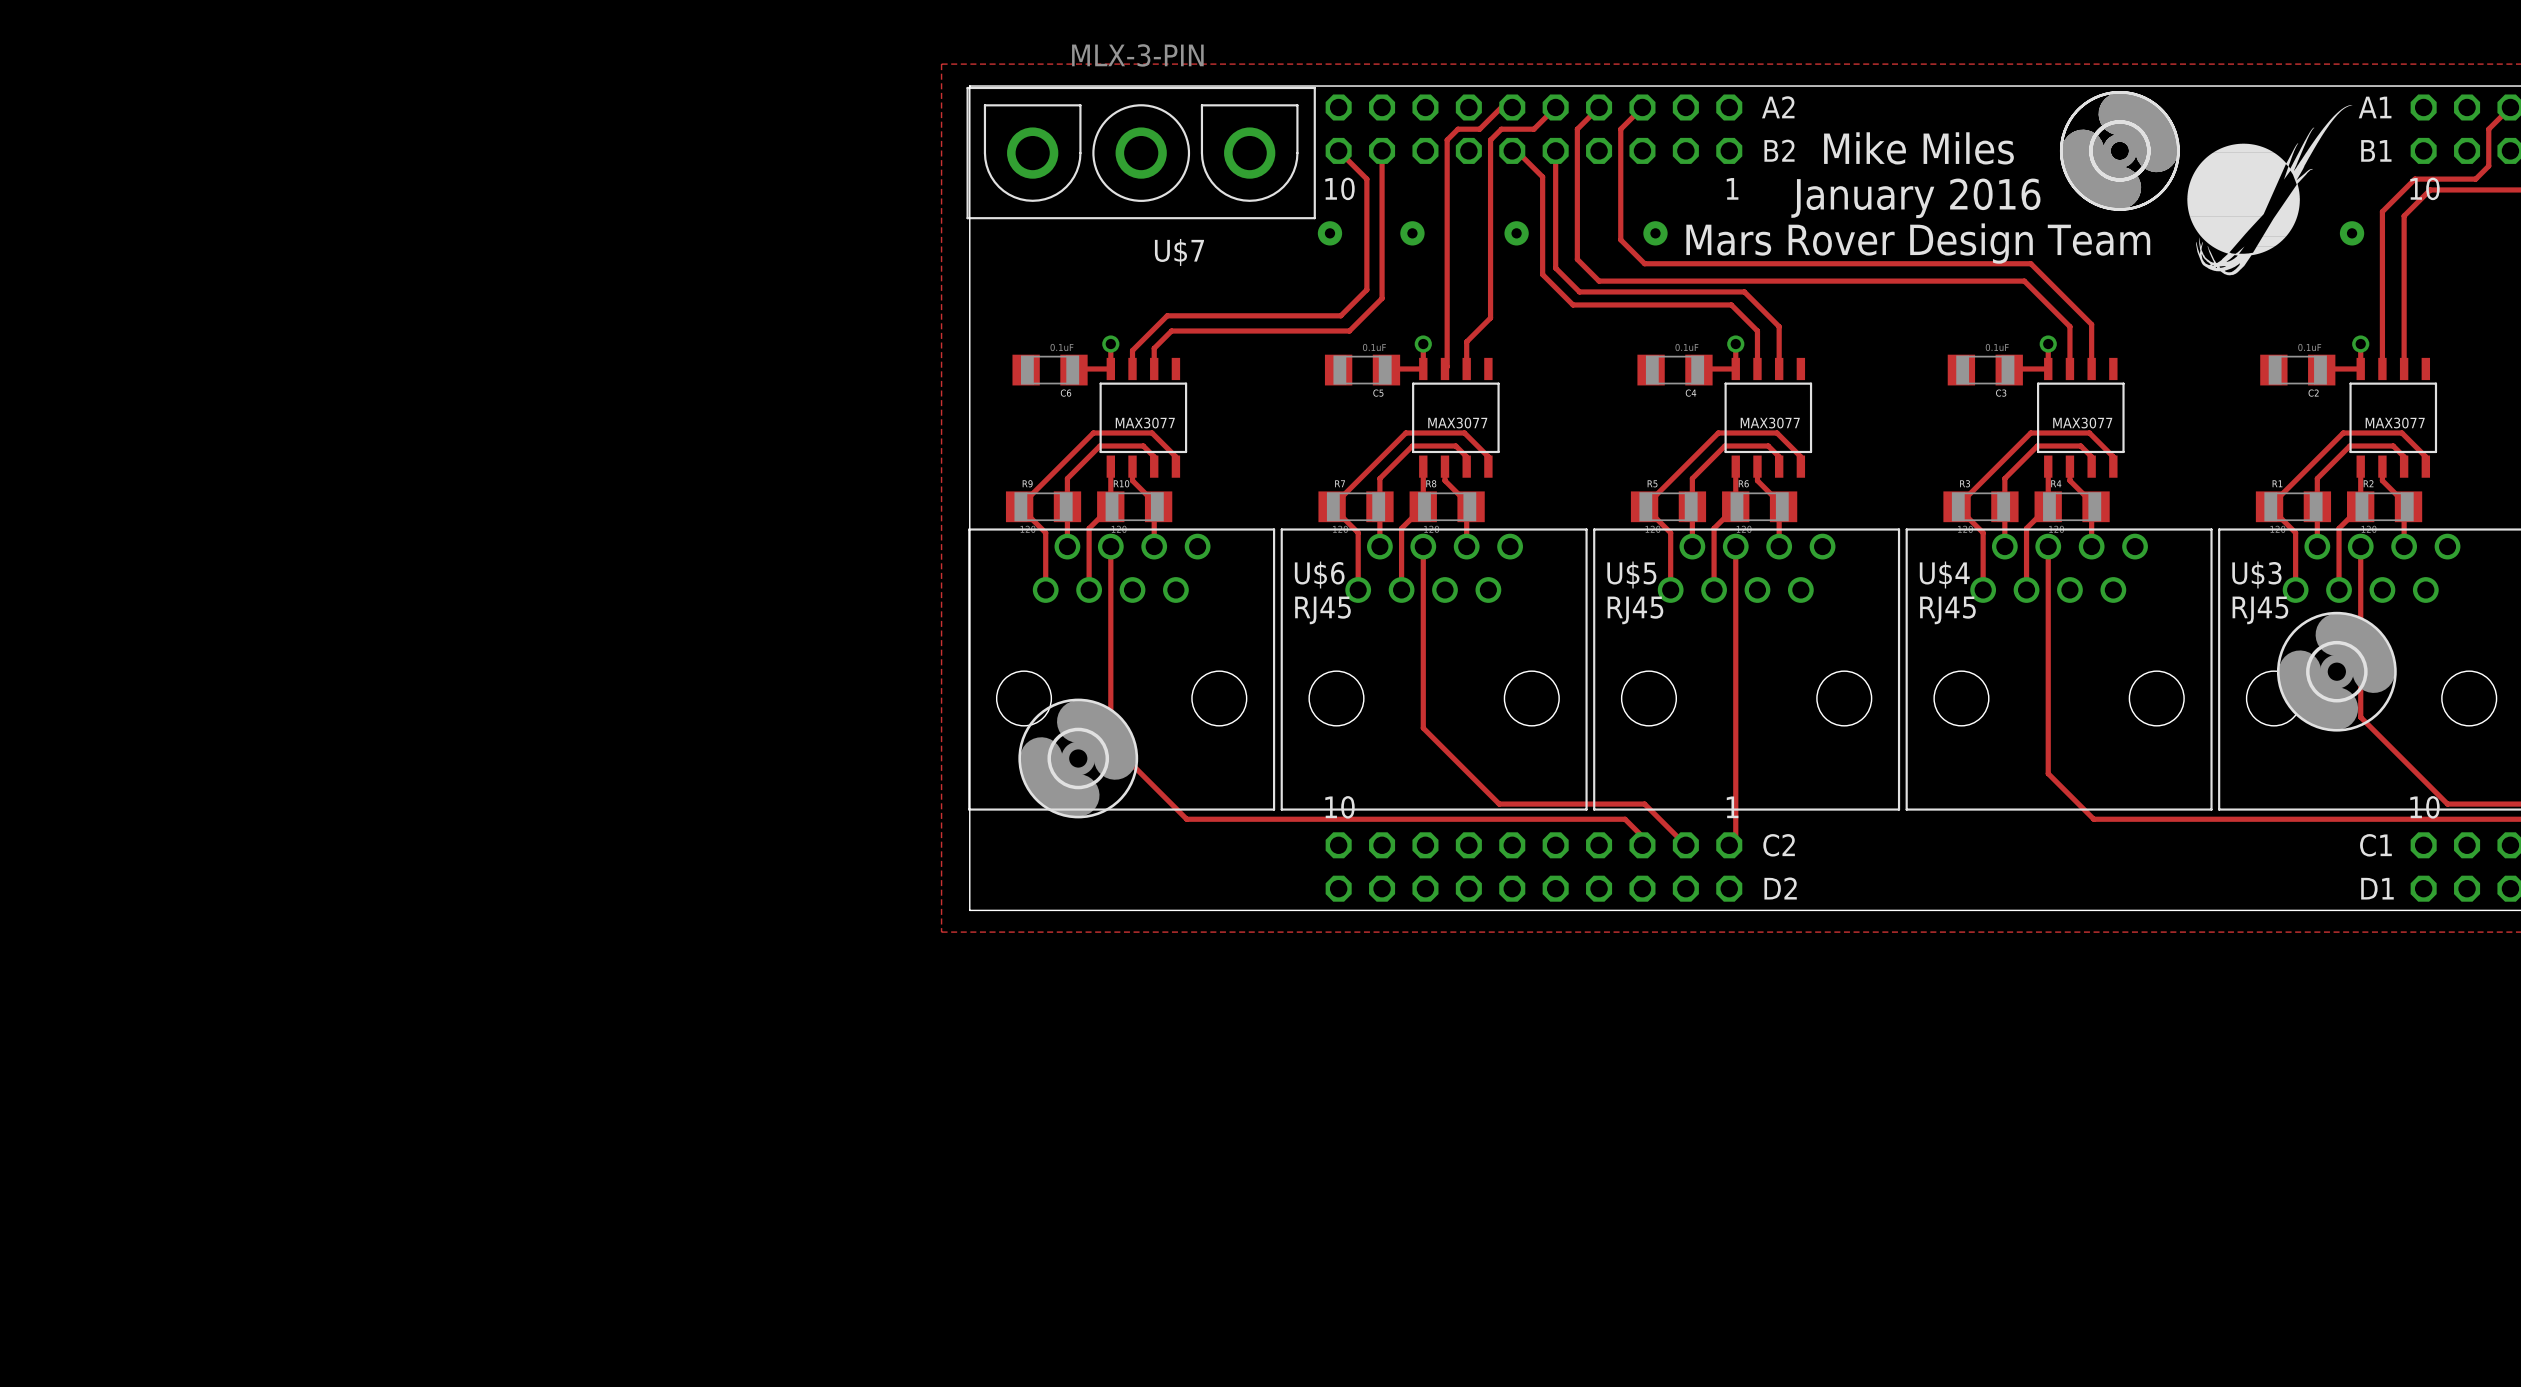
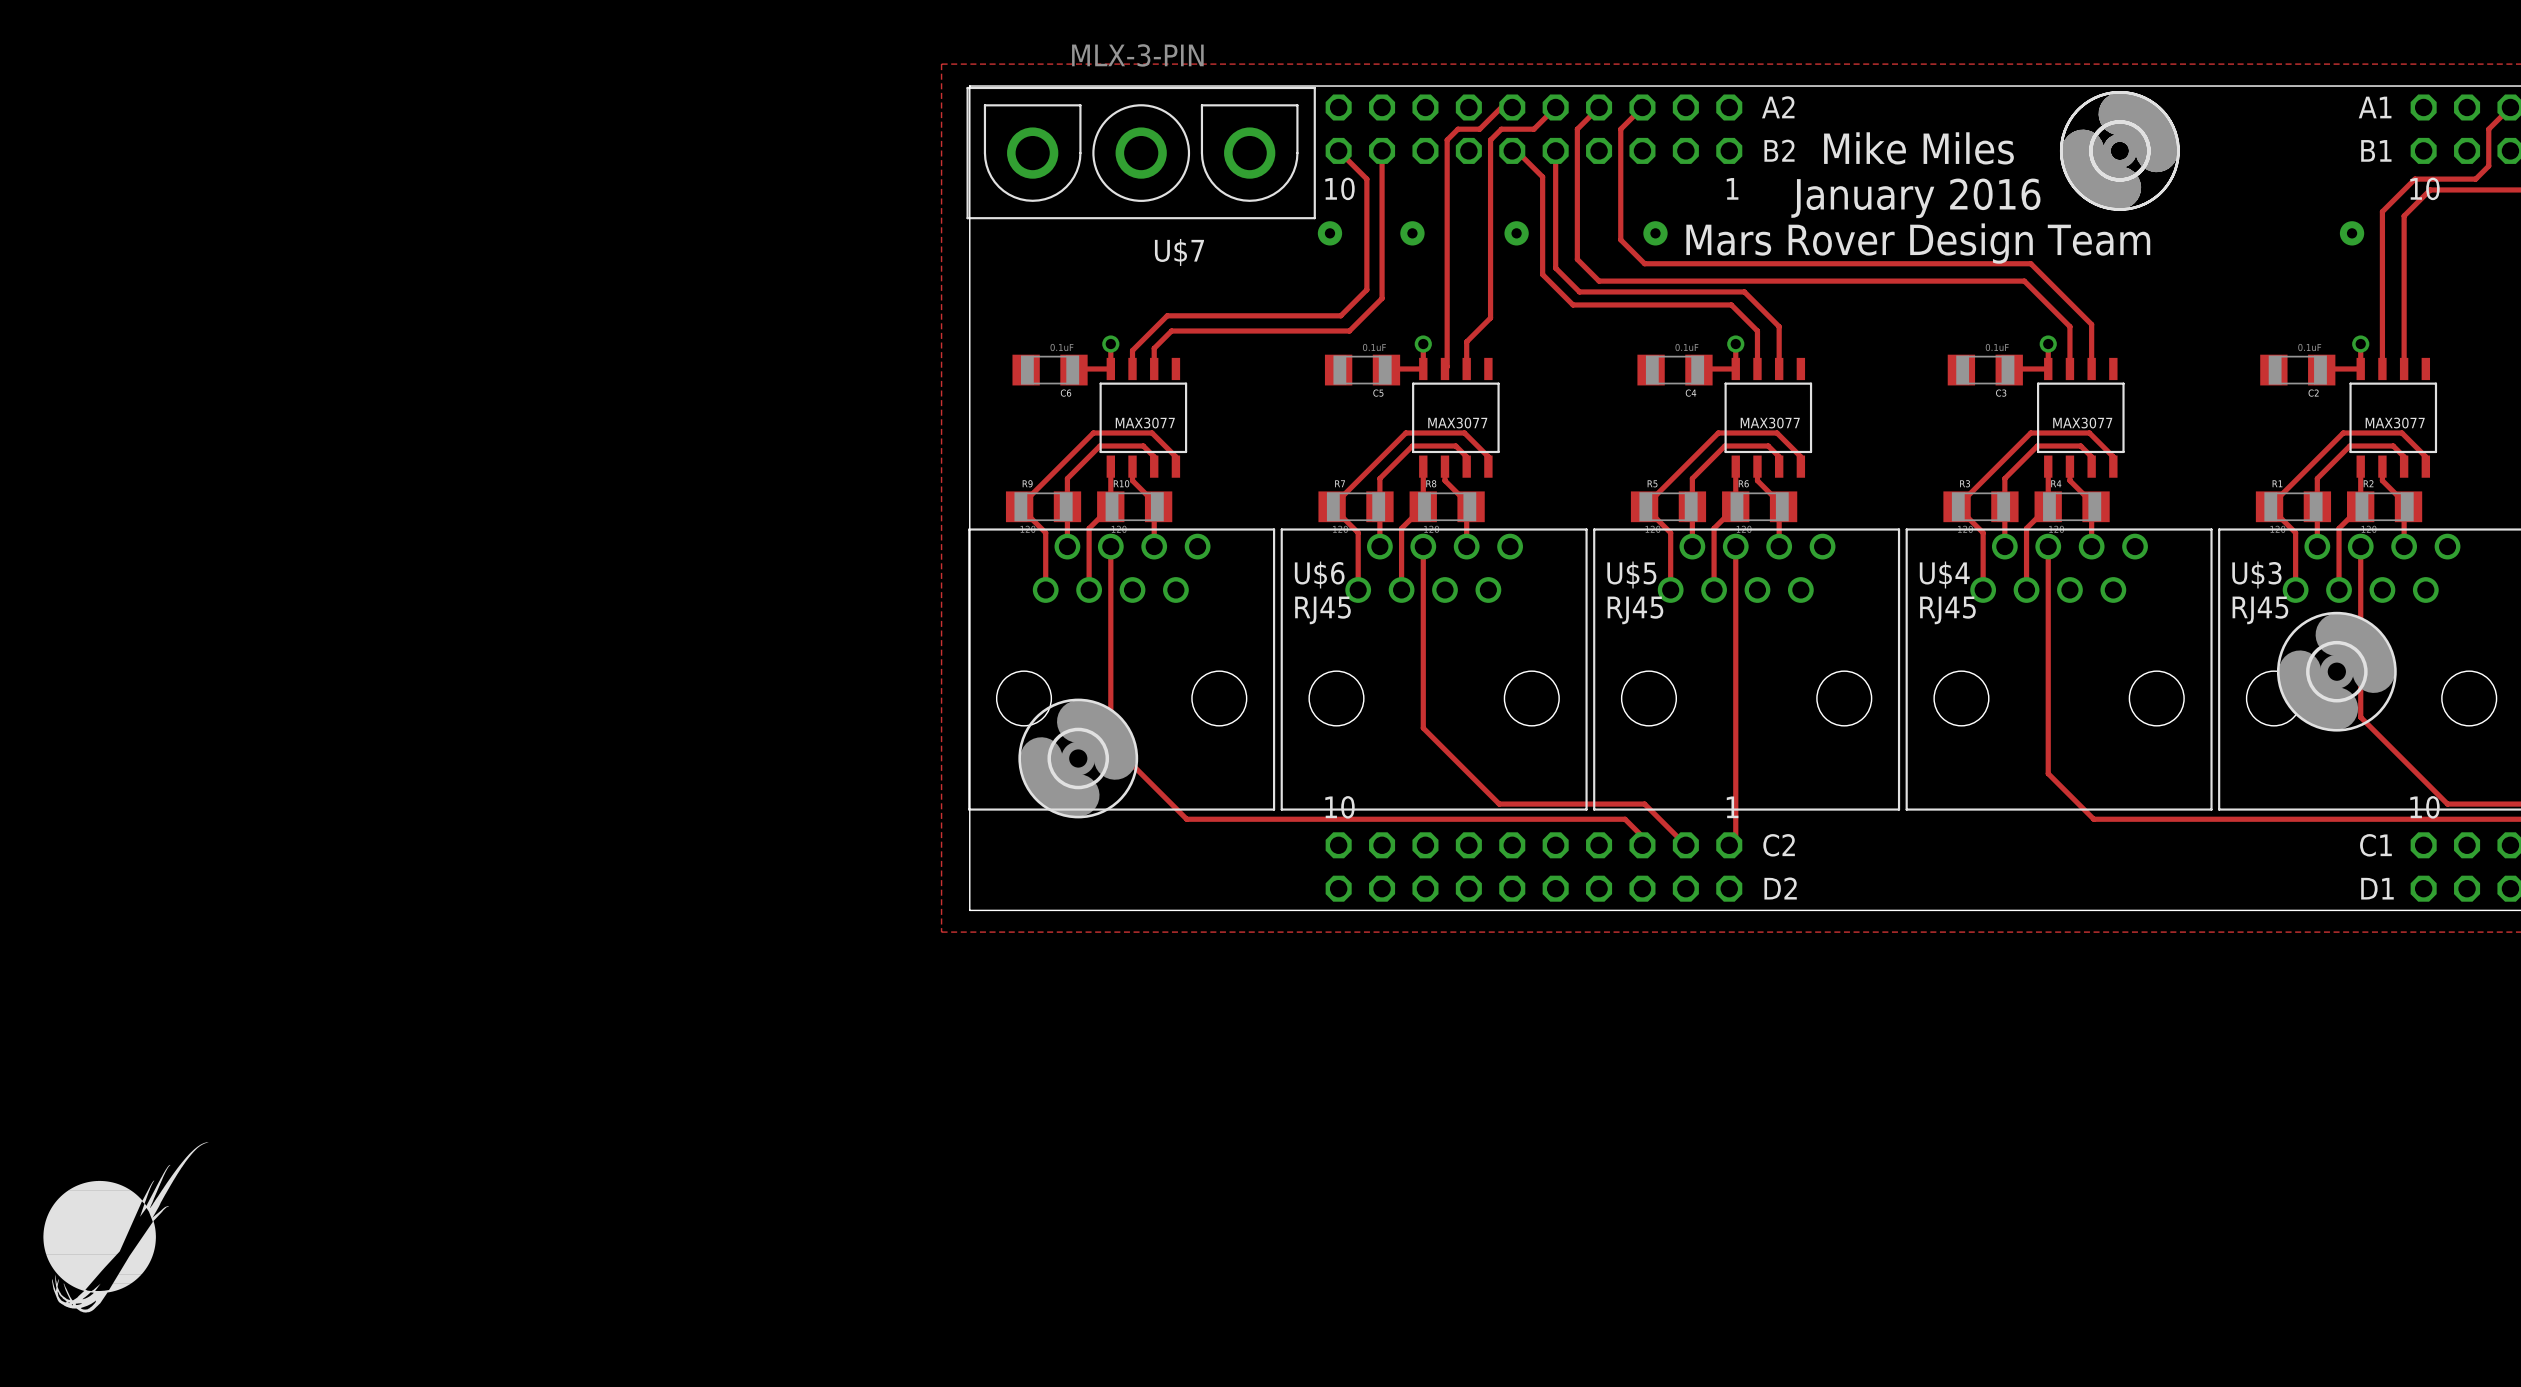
drawing: [2187, 105, 2353, 276] -> none
drawing: none -> [43, 1142, 209, 1313]

